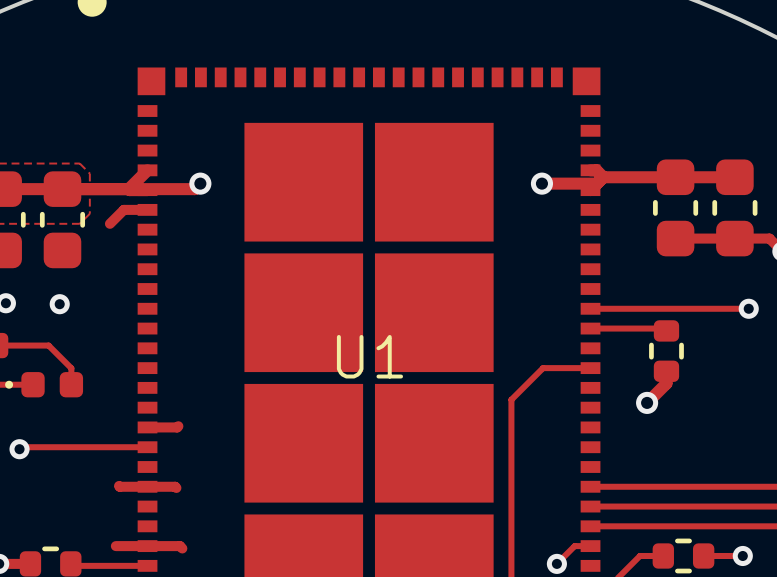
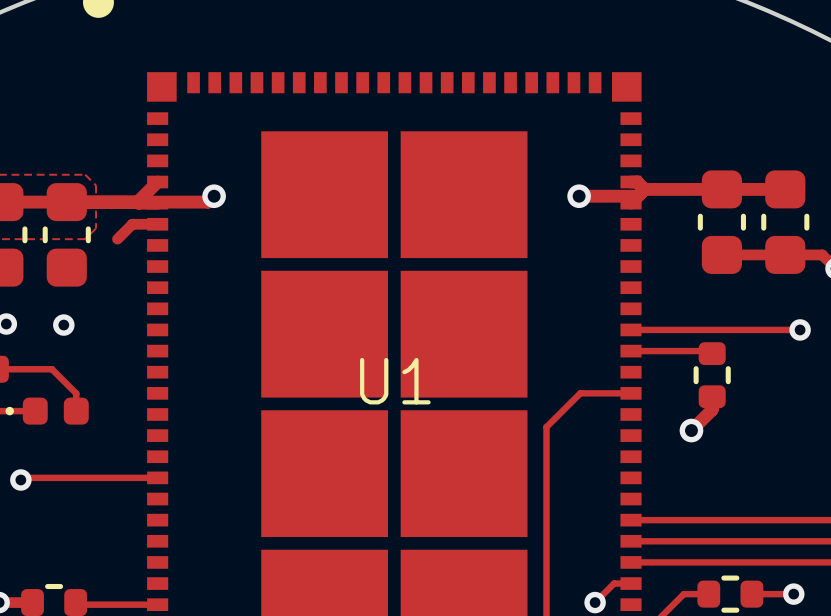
track: (178, 426) (147, 427) -> none
track: (119, 485) (176, 487) -> none
track: (115, 546) (179, 546) (182, 548) -> none

